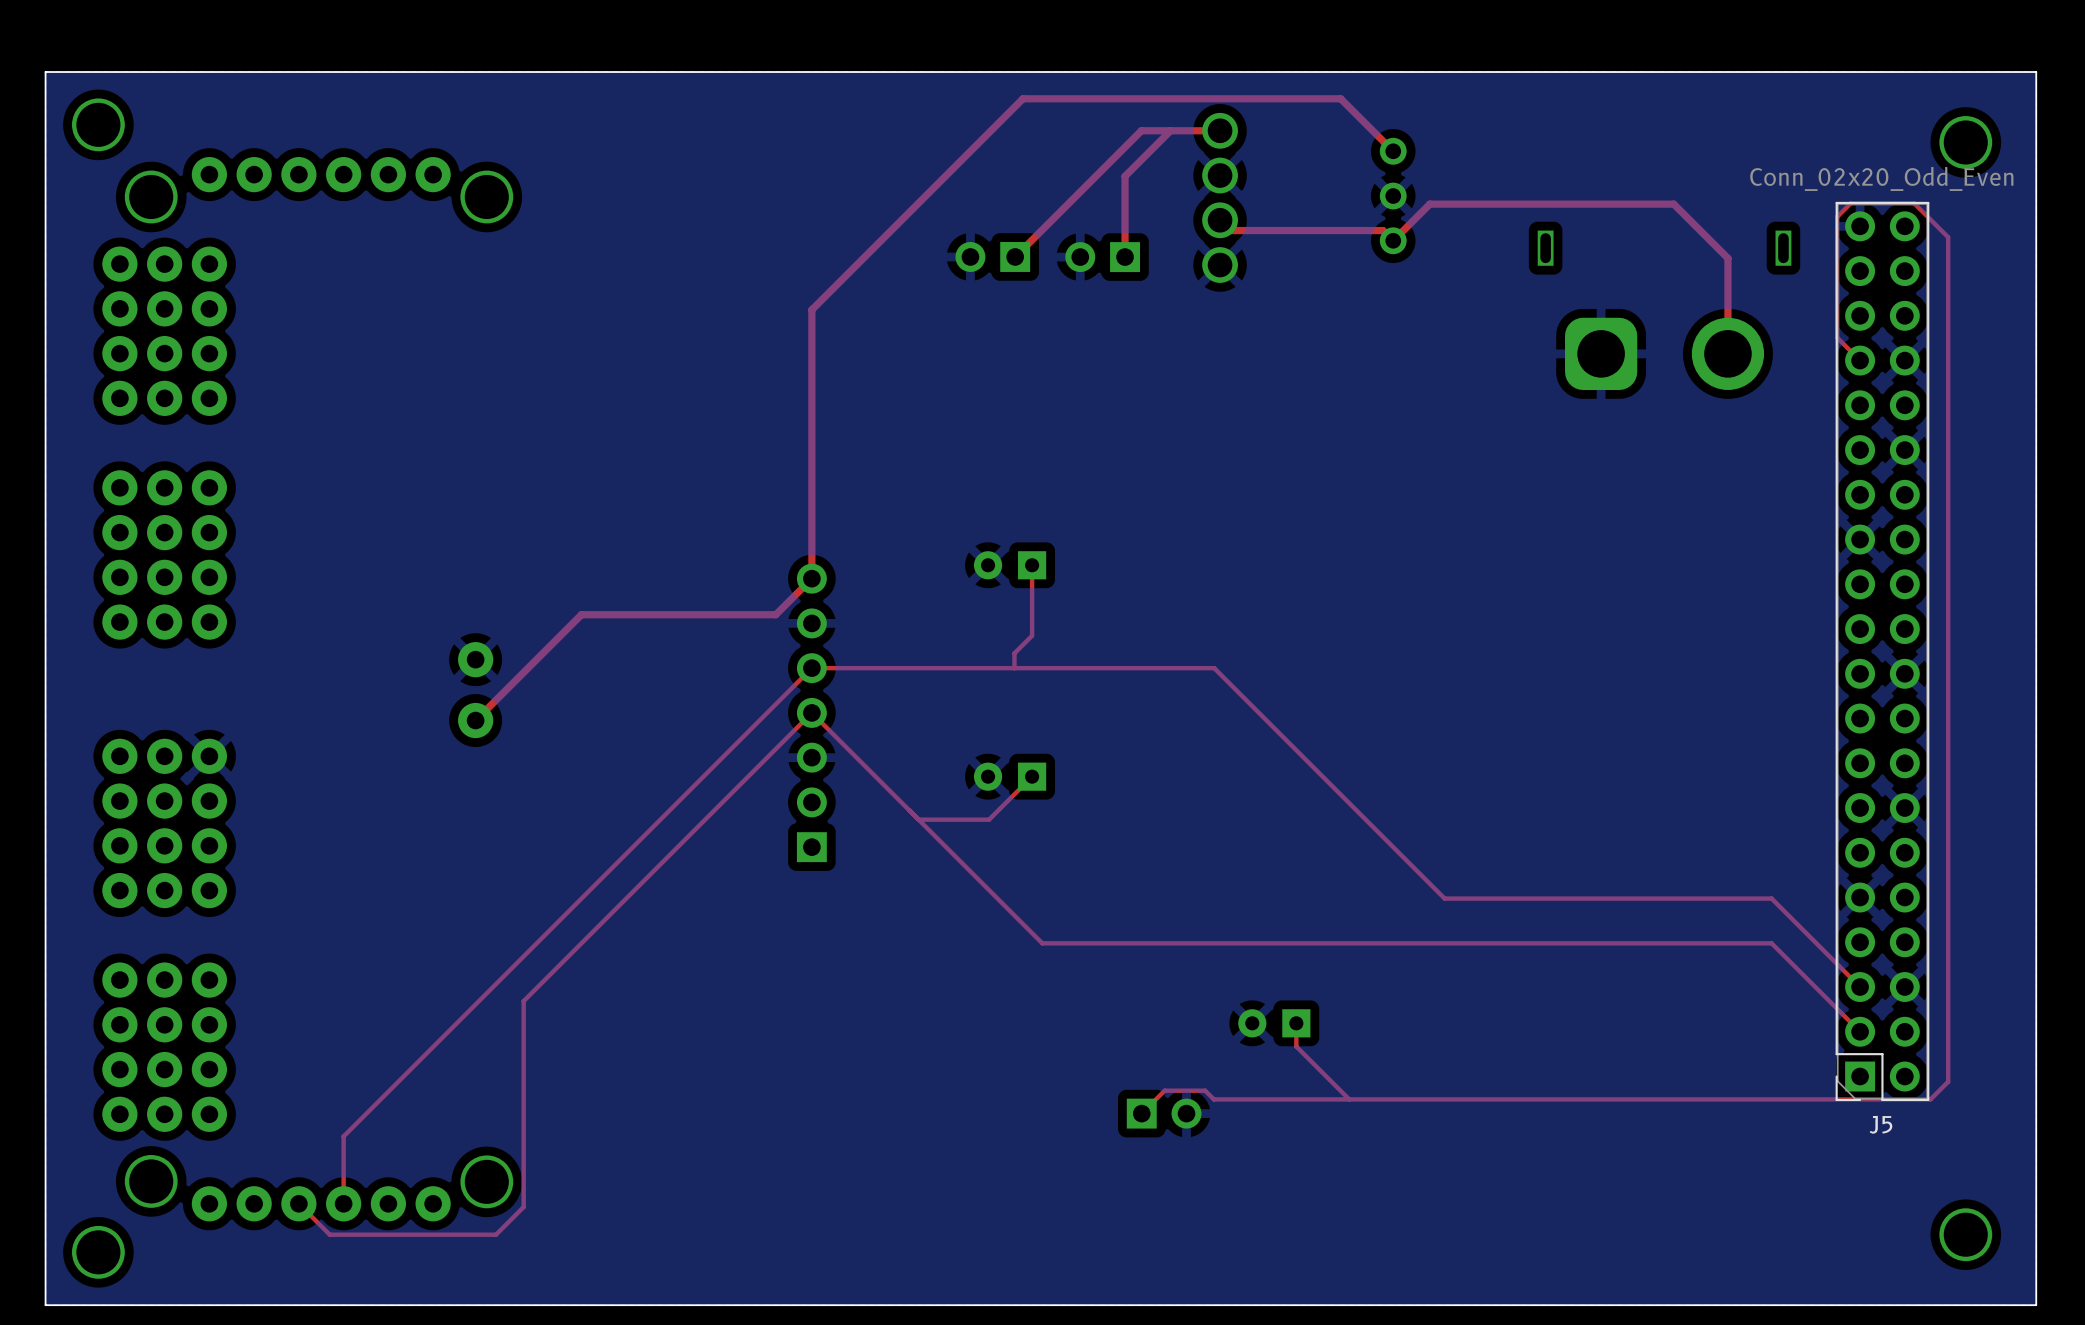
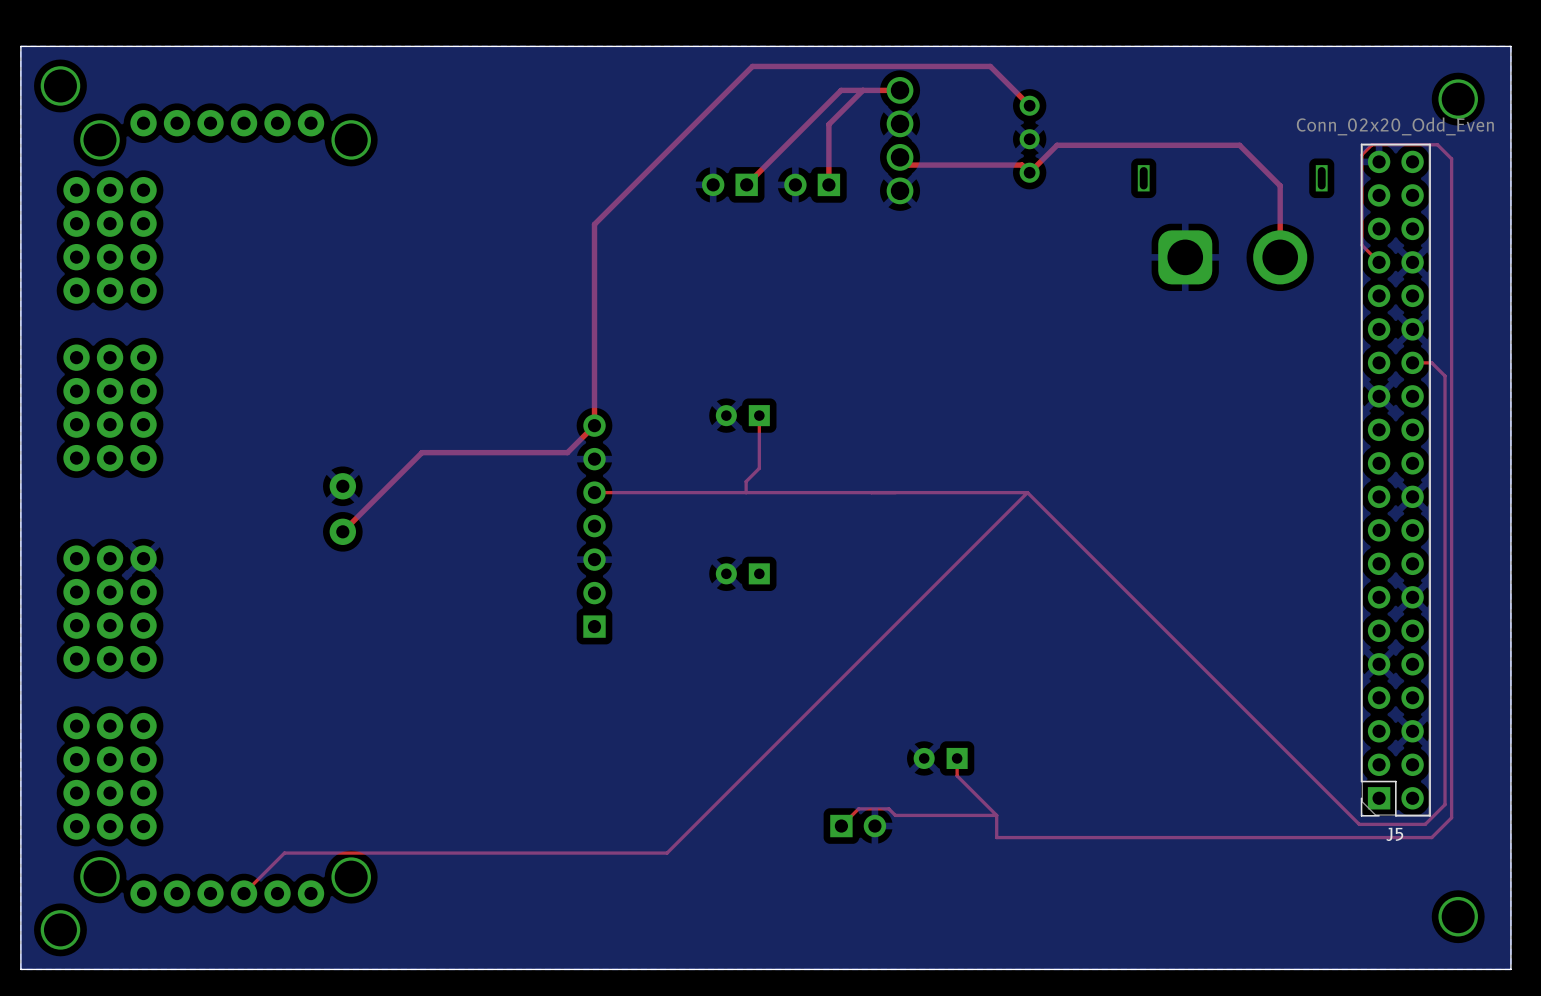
top track: (1914, 203) (1948, 237) (1948, 512) -> (1412, 362) (1431, 362) (1445, 376)
top track: none -> (1419, 144) (1437, 144) (1451, 158) (1451, 817) (1431, 837) (996, 837) (996, 815)
top track: (811, 668) (343, 1136) (343, 1203) -> (1027, 492) (667, 853) (284, 853) (244, 893)
top track: (1214, 668) (1444, 898) (1771, 898) (1860, 987) -> (895, 492) (1027, 492)
top track: (1032, 776) (989, 819) (918, 819) -> none
top track: (1860, 1031) (1771, 943) (1042, 943) (811, 712) (523, 1001) (523, 1207) (496, 1234) (329, 1234) (298, 1203) -> none
top track: (1948, 1081) (1930, 1099) (1349, 1099) -> (1445, 802) (1445, 804) (1425, 824) (1359, 824) (1027, 492)

